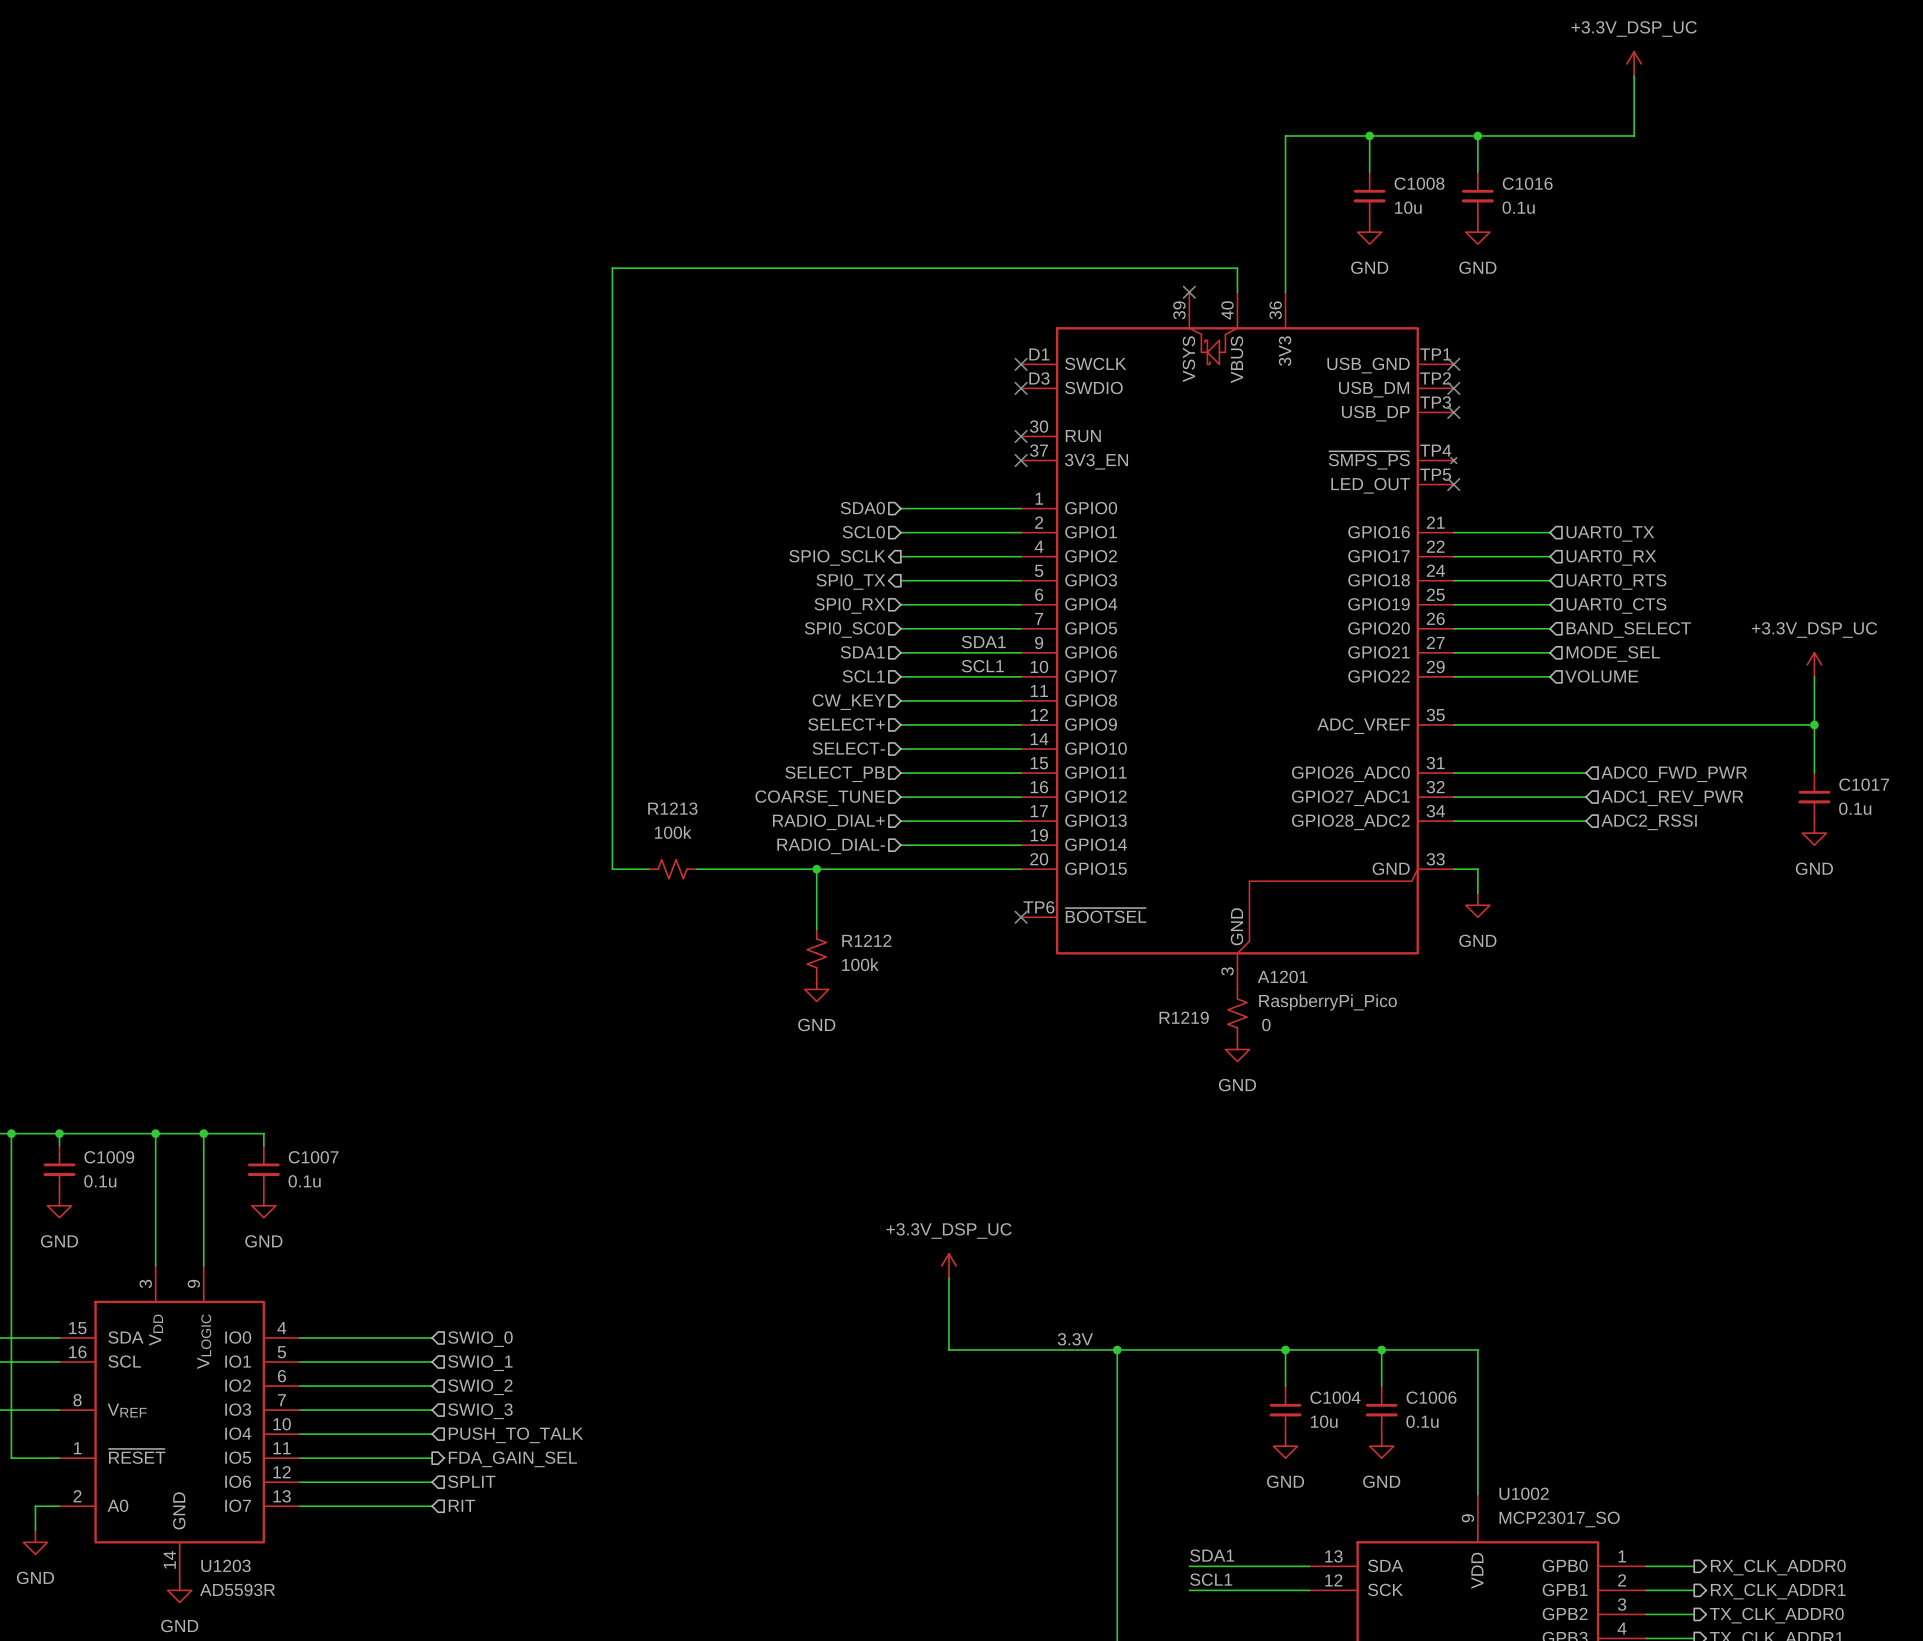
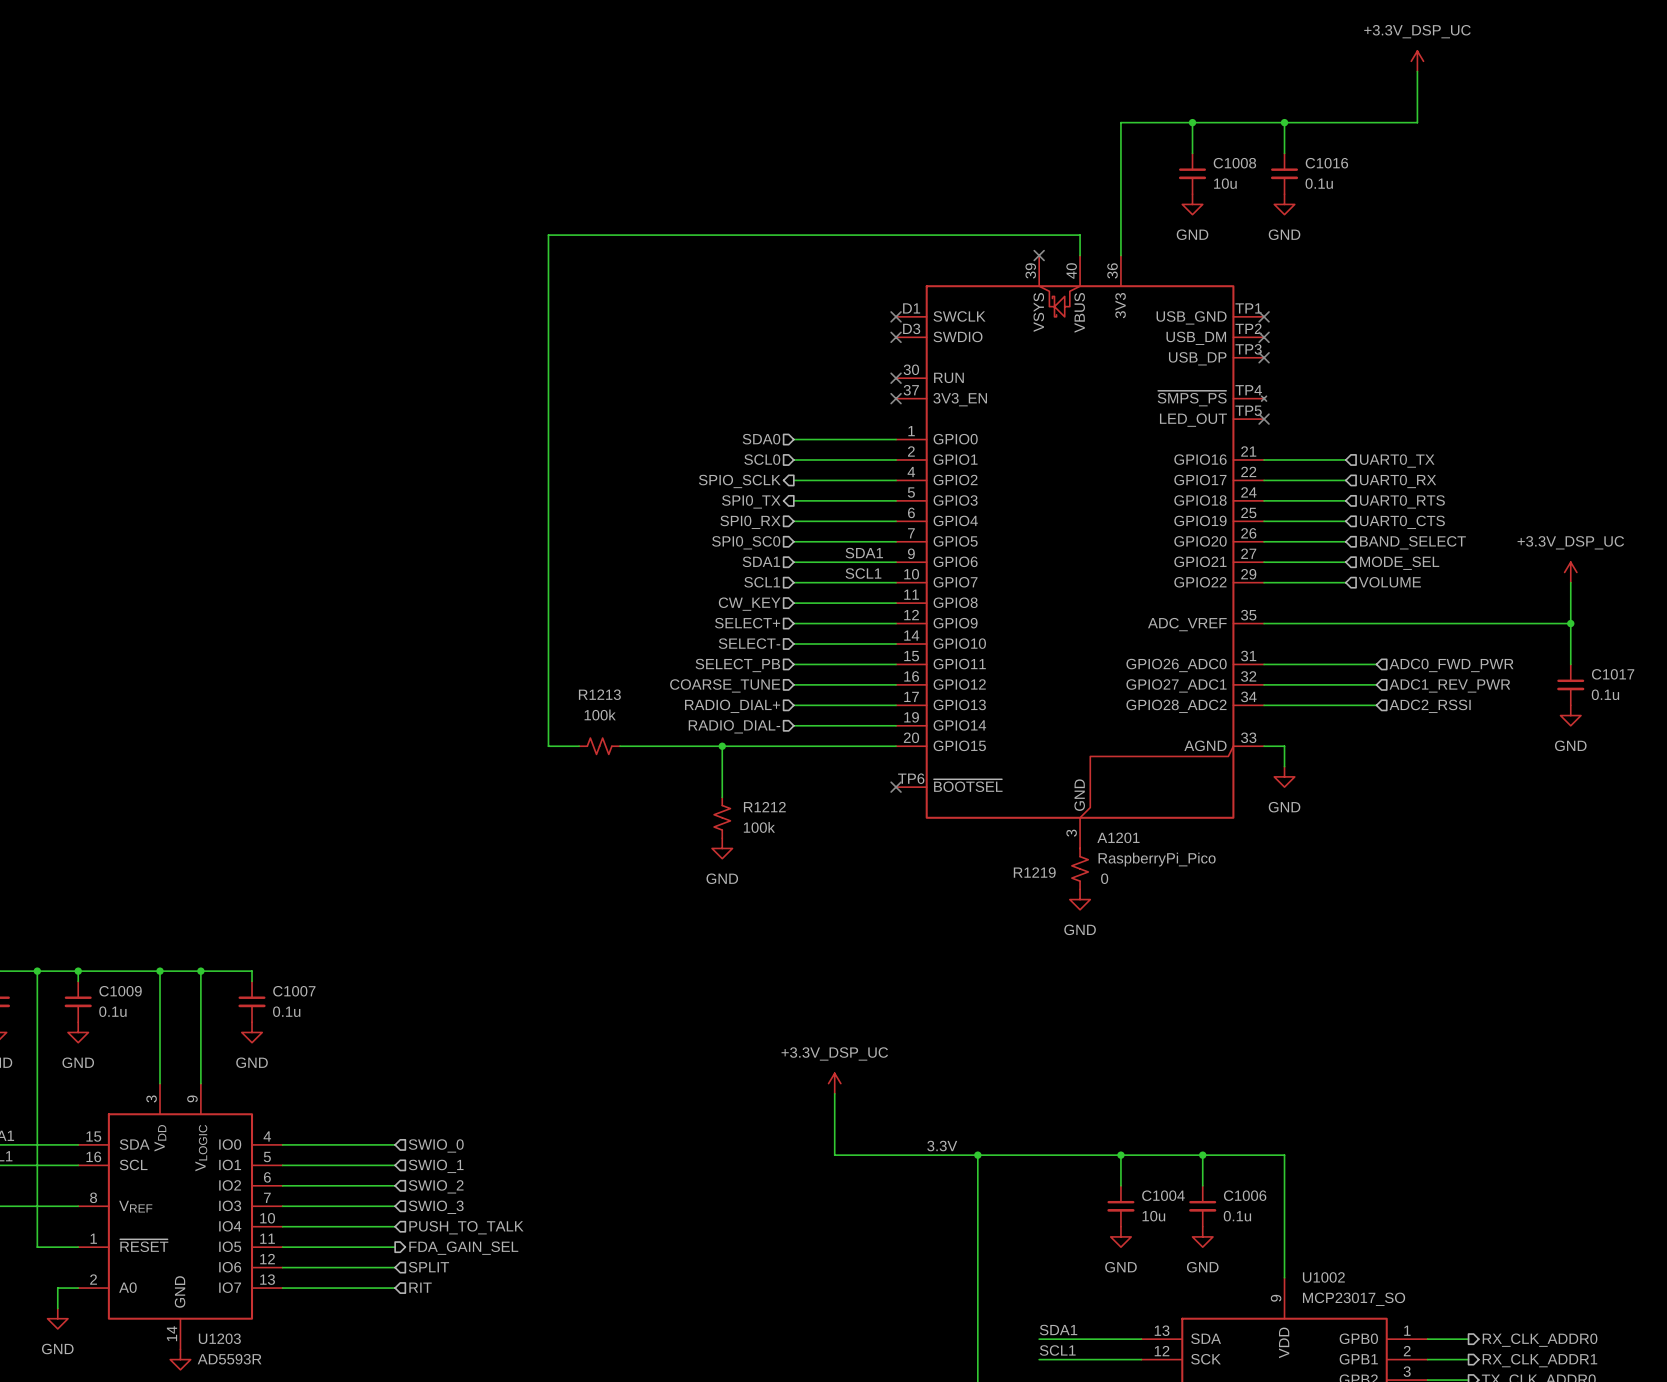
A1201 pin name: GND (1391, 868) -> AGND (1205, 745)

